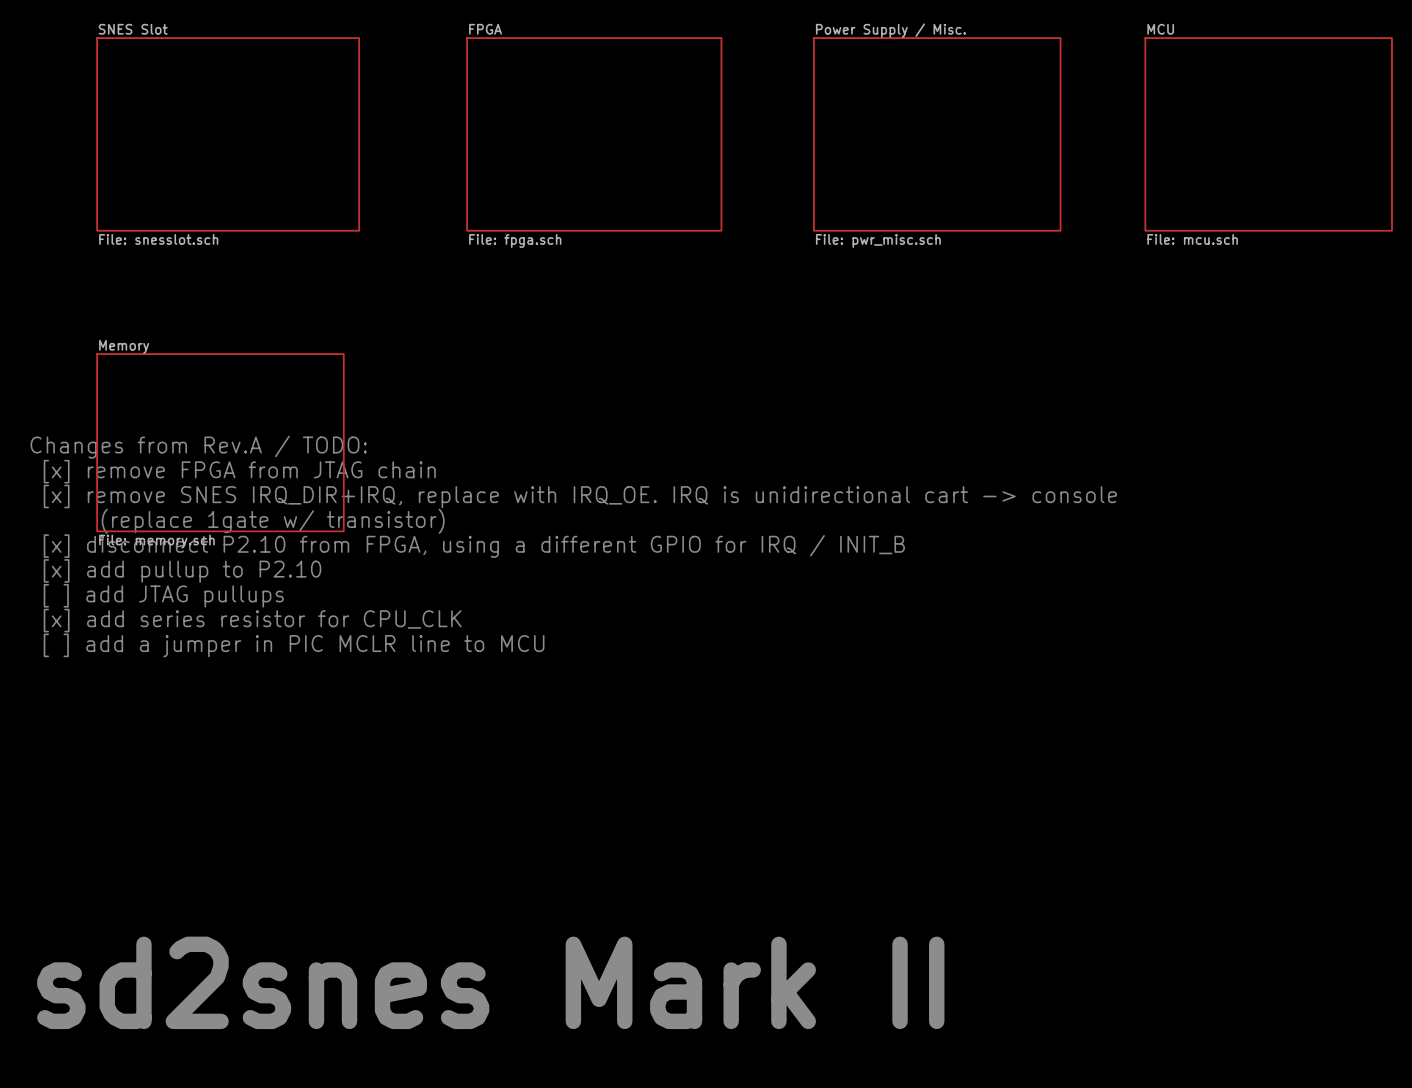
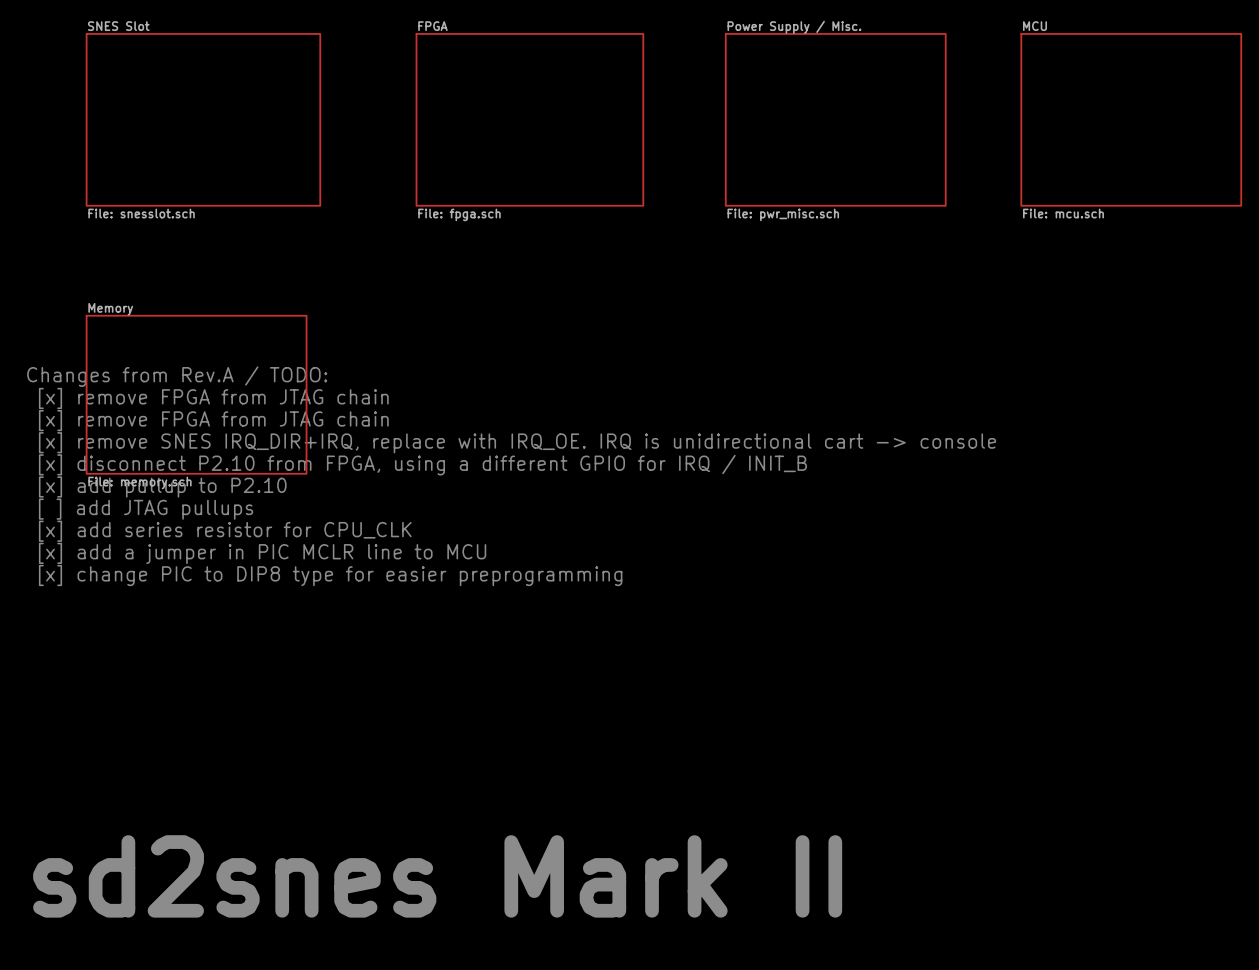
text: none -> Changes from Rev.A / TODO: (177, 376)
text: Changes from Rev.A / TODO: (198, 447) -> [x] remove FPGA from JTAG chain (213, 398)
text: (replace 1gate w/ transistor) (273, 521) -> [x] disconnect P2.10 from FPGA, using a different GPIO for IRQ / INIT_B (422, 464)
text: [x] disconnect P2.10 from FPGA, using a different GPIO for IRQ / INIT_B (474, 546) -> [x] add pullup to P2.10 (162, 486)
text: [x] add pullup to P2.10 (182, 570) -> [ ] add JTAG pullups (146, 509)
text: [ ] add JTAG pullups (163, 595) -> [x] add series resistor for CPU_CLK (225, 531)
text: [x] add series resistor for CPU_CLK (252, 620) -> [x] add a jumper in PIC MCLR line to MCU (262, 553)
text: [ ] add a jumper in PIC MCLR line to MCU (294, 645) -> [x] change PIC to DIP8 type for easier preprogramming (330, 575)

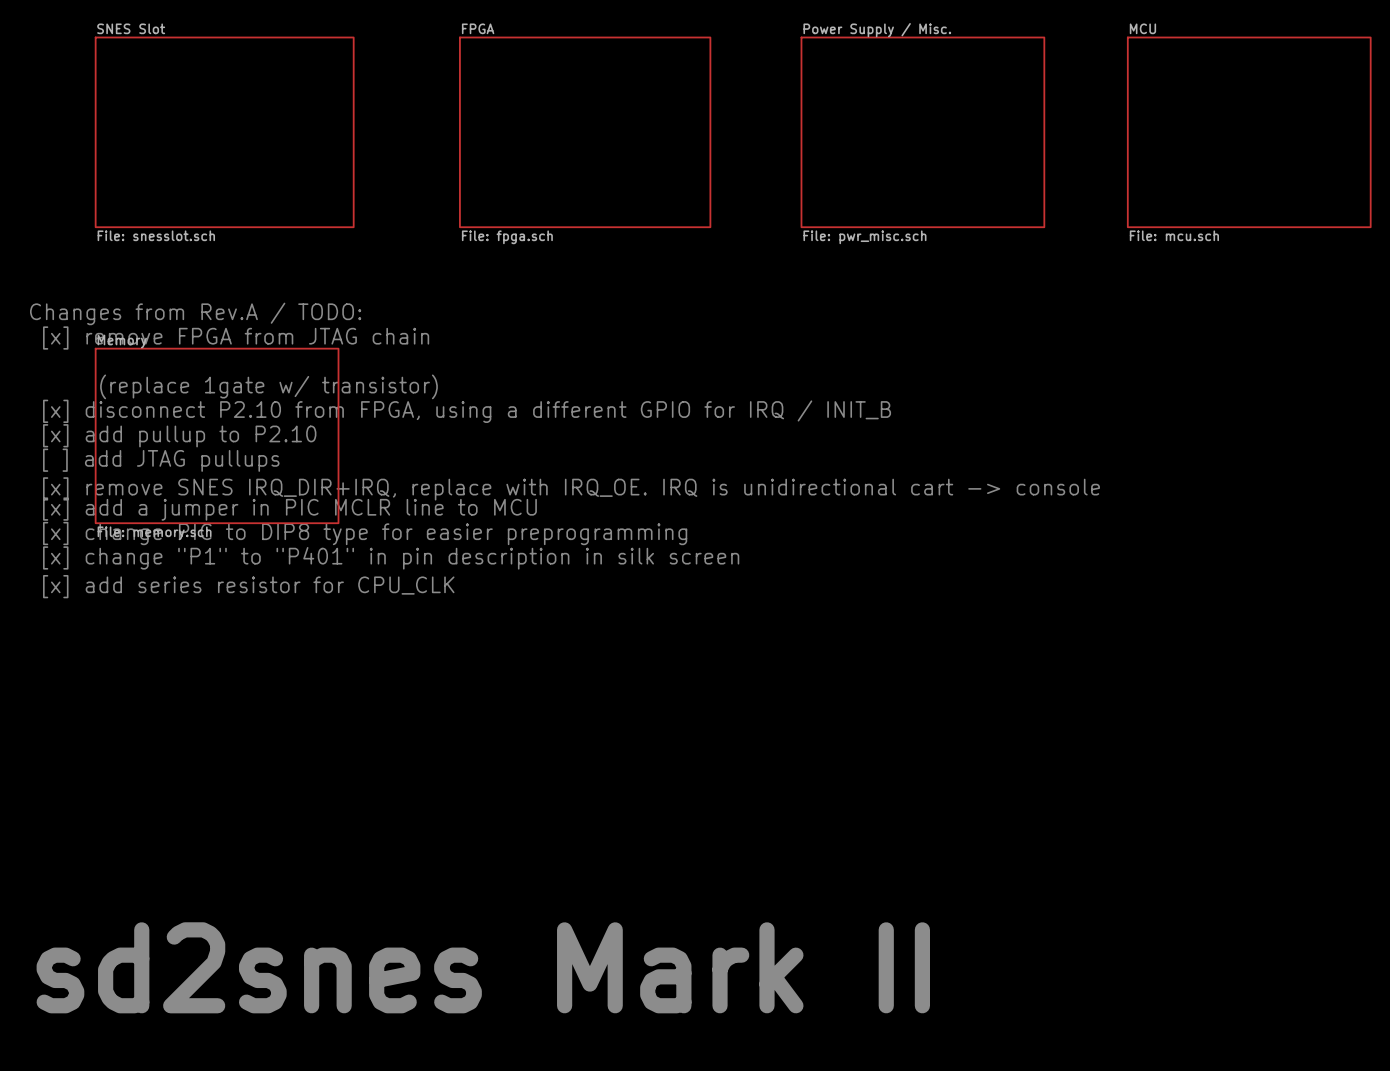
text: none -> [x] remove FPGA from JTAG chain (236, 338)
text: none -> (replace 1gate w/ transistor) (268, 386)
text position: Changes from Rev.A / TODO: (177, 376) -> Changes from Rev.A / TODO: (195, 313)
text: [x] remove FPGA from JTAG chain (213, 398) -> none
text: [x] remove FPGA from JTAG chain (213, 420) -> none
text position: [x] disconnect P2.10 from FPGA, using a different GPIO for IRQ / INIT_B (422, 464) -> [x] disconnect P2.10 from FPGA, using a different GPIO for IRQ / INIT_B (467, 411)
text position: [x] add pullup to P2.10 (162, 486) -> [x] add pullup to P2.10 (179, 435)
text: none -> [x] change "P1" to "P401" in pin description in silk screen (391, 557)
text position: [ ] add JTAG pullups (146, 509) -> [ ] add JTAG pullups (161, 460)
text position: [x] add a jumper in PIC MCLR line to MCU (262, 553) -> [x] add a jumper in PIC MCLR line to MCU (289, 509)
text position: [x] change PIC to DIP8 type for easier preprogramming (330, 575) -> [x] change PIC to DIP8 type for easier preprogramming (365, 533)

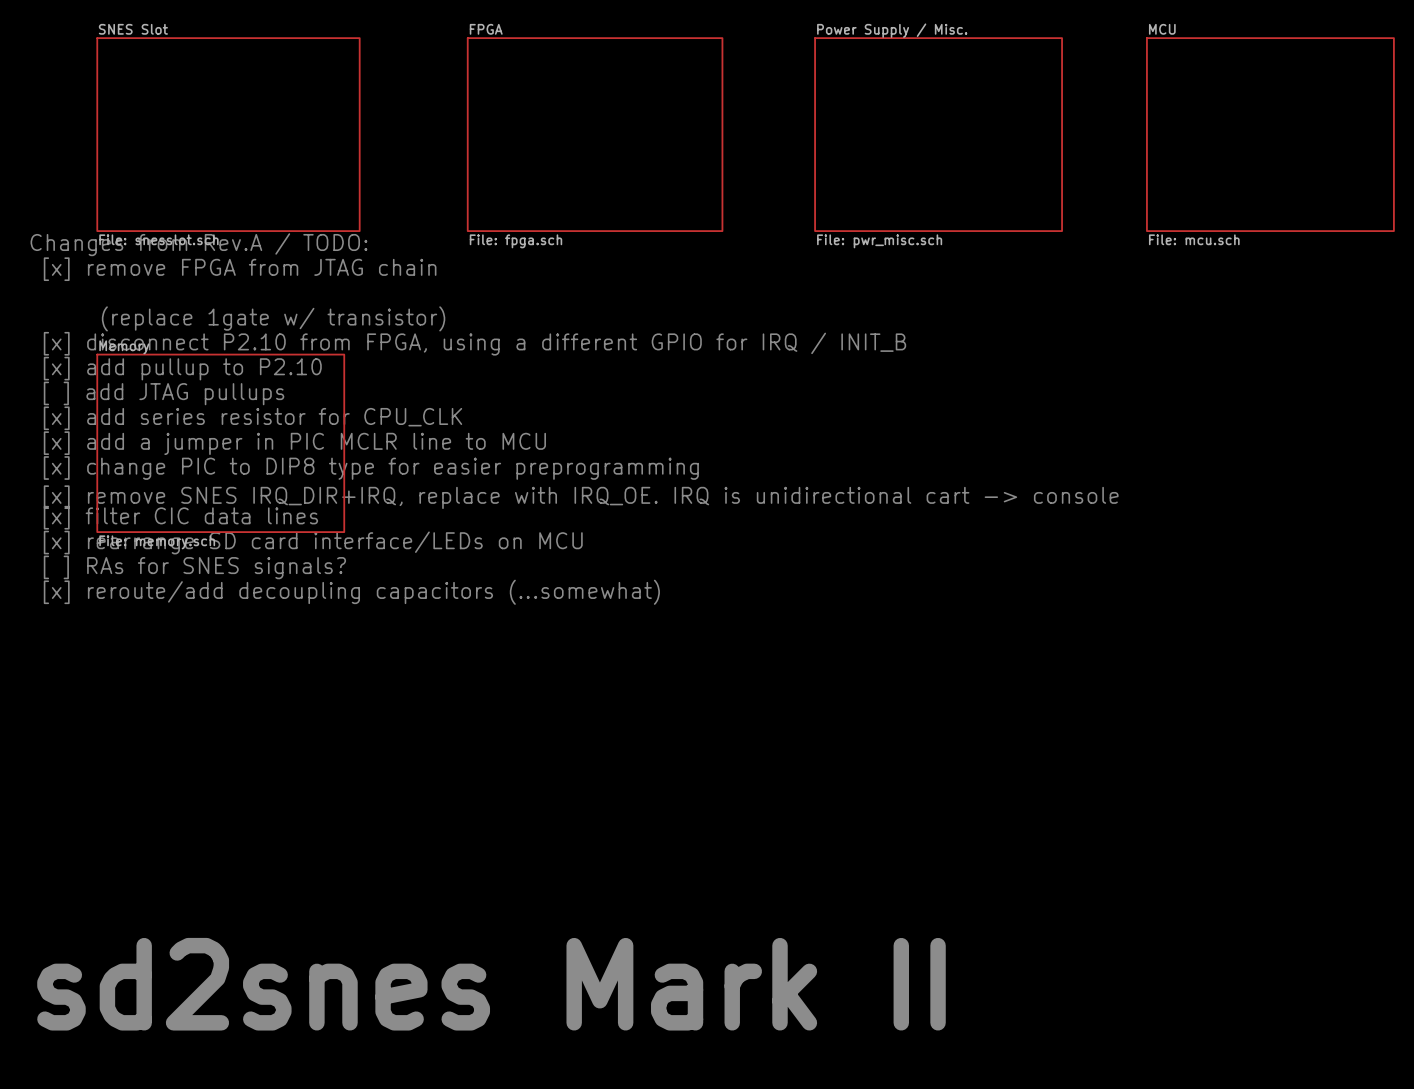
text: none -> Changes from Rev.A / TODO: (198, 244)
text: none -> [x] remove FPGA from JTAG chain (240, 269)
text: Changes from Rev.A / TODO: (195, 313) -> (replace 1gate w/ transistor) (273, 318)
text: [x] remove FPGA from JTAG chain (236, 338) -> [x] disconnect P2.10 from FPGA, using a different GPIO for IRQ / INIT_B (474, 343)
text: none -> [x] add pullup to P2.10 (182, 368)
text: (replace 1gate w/ transistor) (268, 386) -> [ ] add JTAG pullups (164, 393)
text: [x] disconnect P2.10 from FPGA, using a different GPIO for IRQ / INIT_B (467, 411) -> [x] add series resistor for CPU_CLK (252, 418)
text: [x] add pullup to P2.10 (179, 435) -> [x] add a jumper in PIC MCLR line to MCU (294, 443)
text: [ ] add JTAG pullups (161, 460) -> [x] change PIC to DIP8 type for easier preprogramming (371, 468)
text: [x] add a jumper in PIC MCLR line to MCU (289, 509) -> [x] filter CIC data lines (180, 517)
text: [x] change PIC to DIP8 type for easier preprogramming (365, 533) -> [x] rearrange SD card interface/LEDs on MCU (313, 542)
text: [x] change "P1" to "P401" in pin description in silk screen (391, 557) -> [ ] RAs for SNES signals? (194, 567)
text: [x] add series resistor for CPU_CLK (248, 586) -> [x] reroute/add decoupling capacitors (...somewhat) (351, 592)

